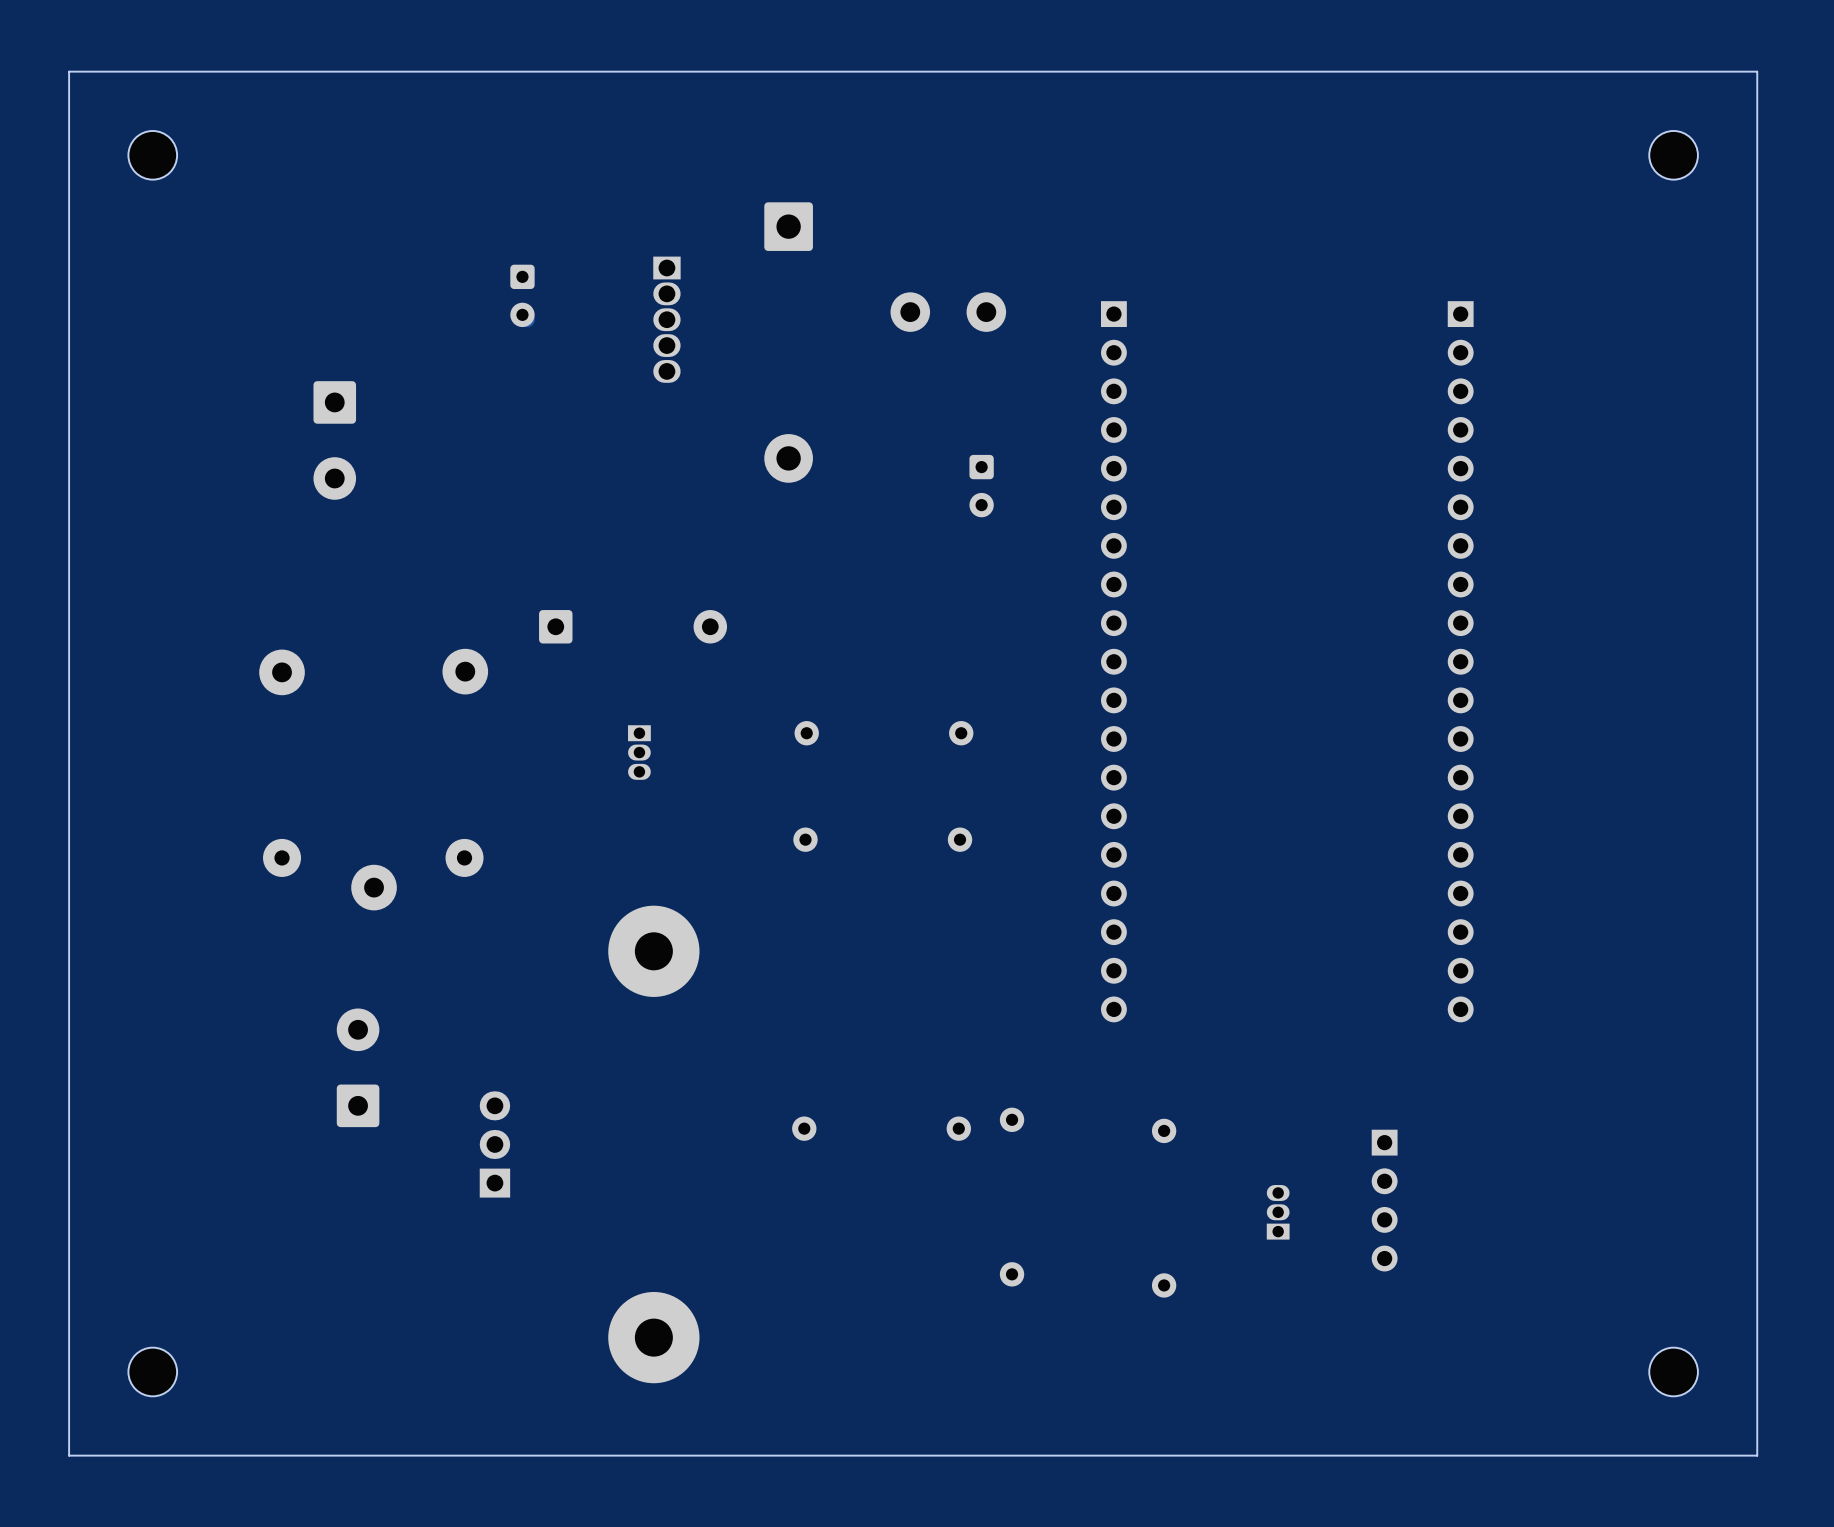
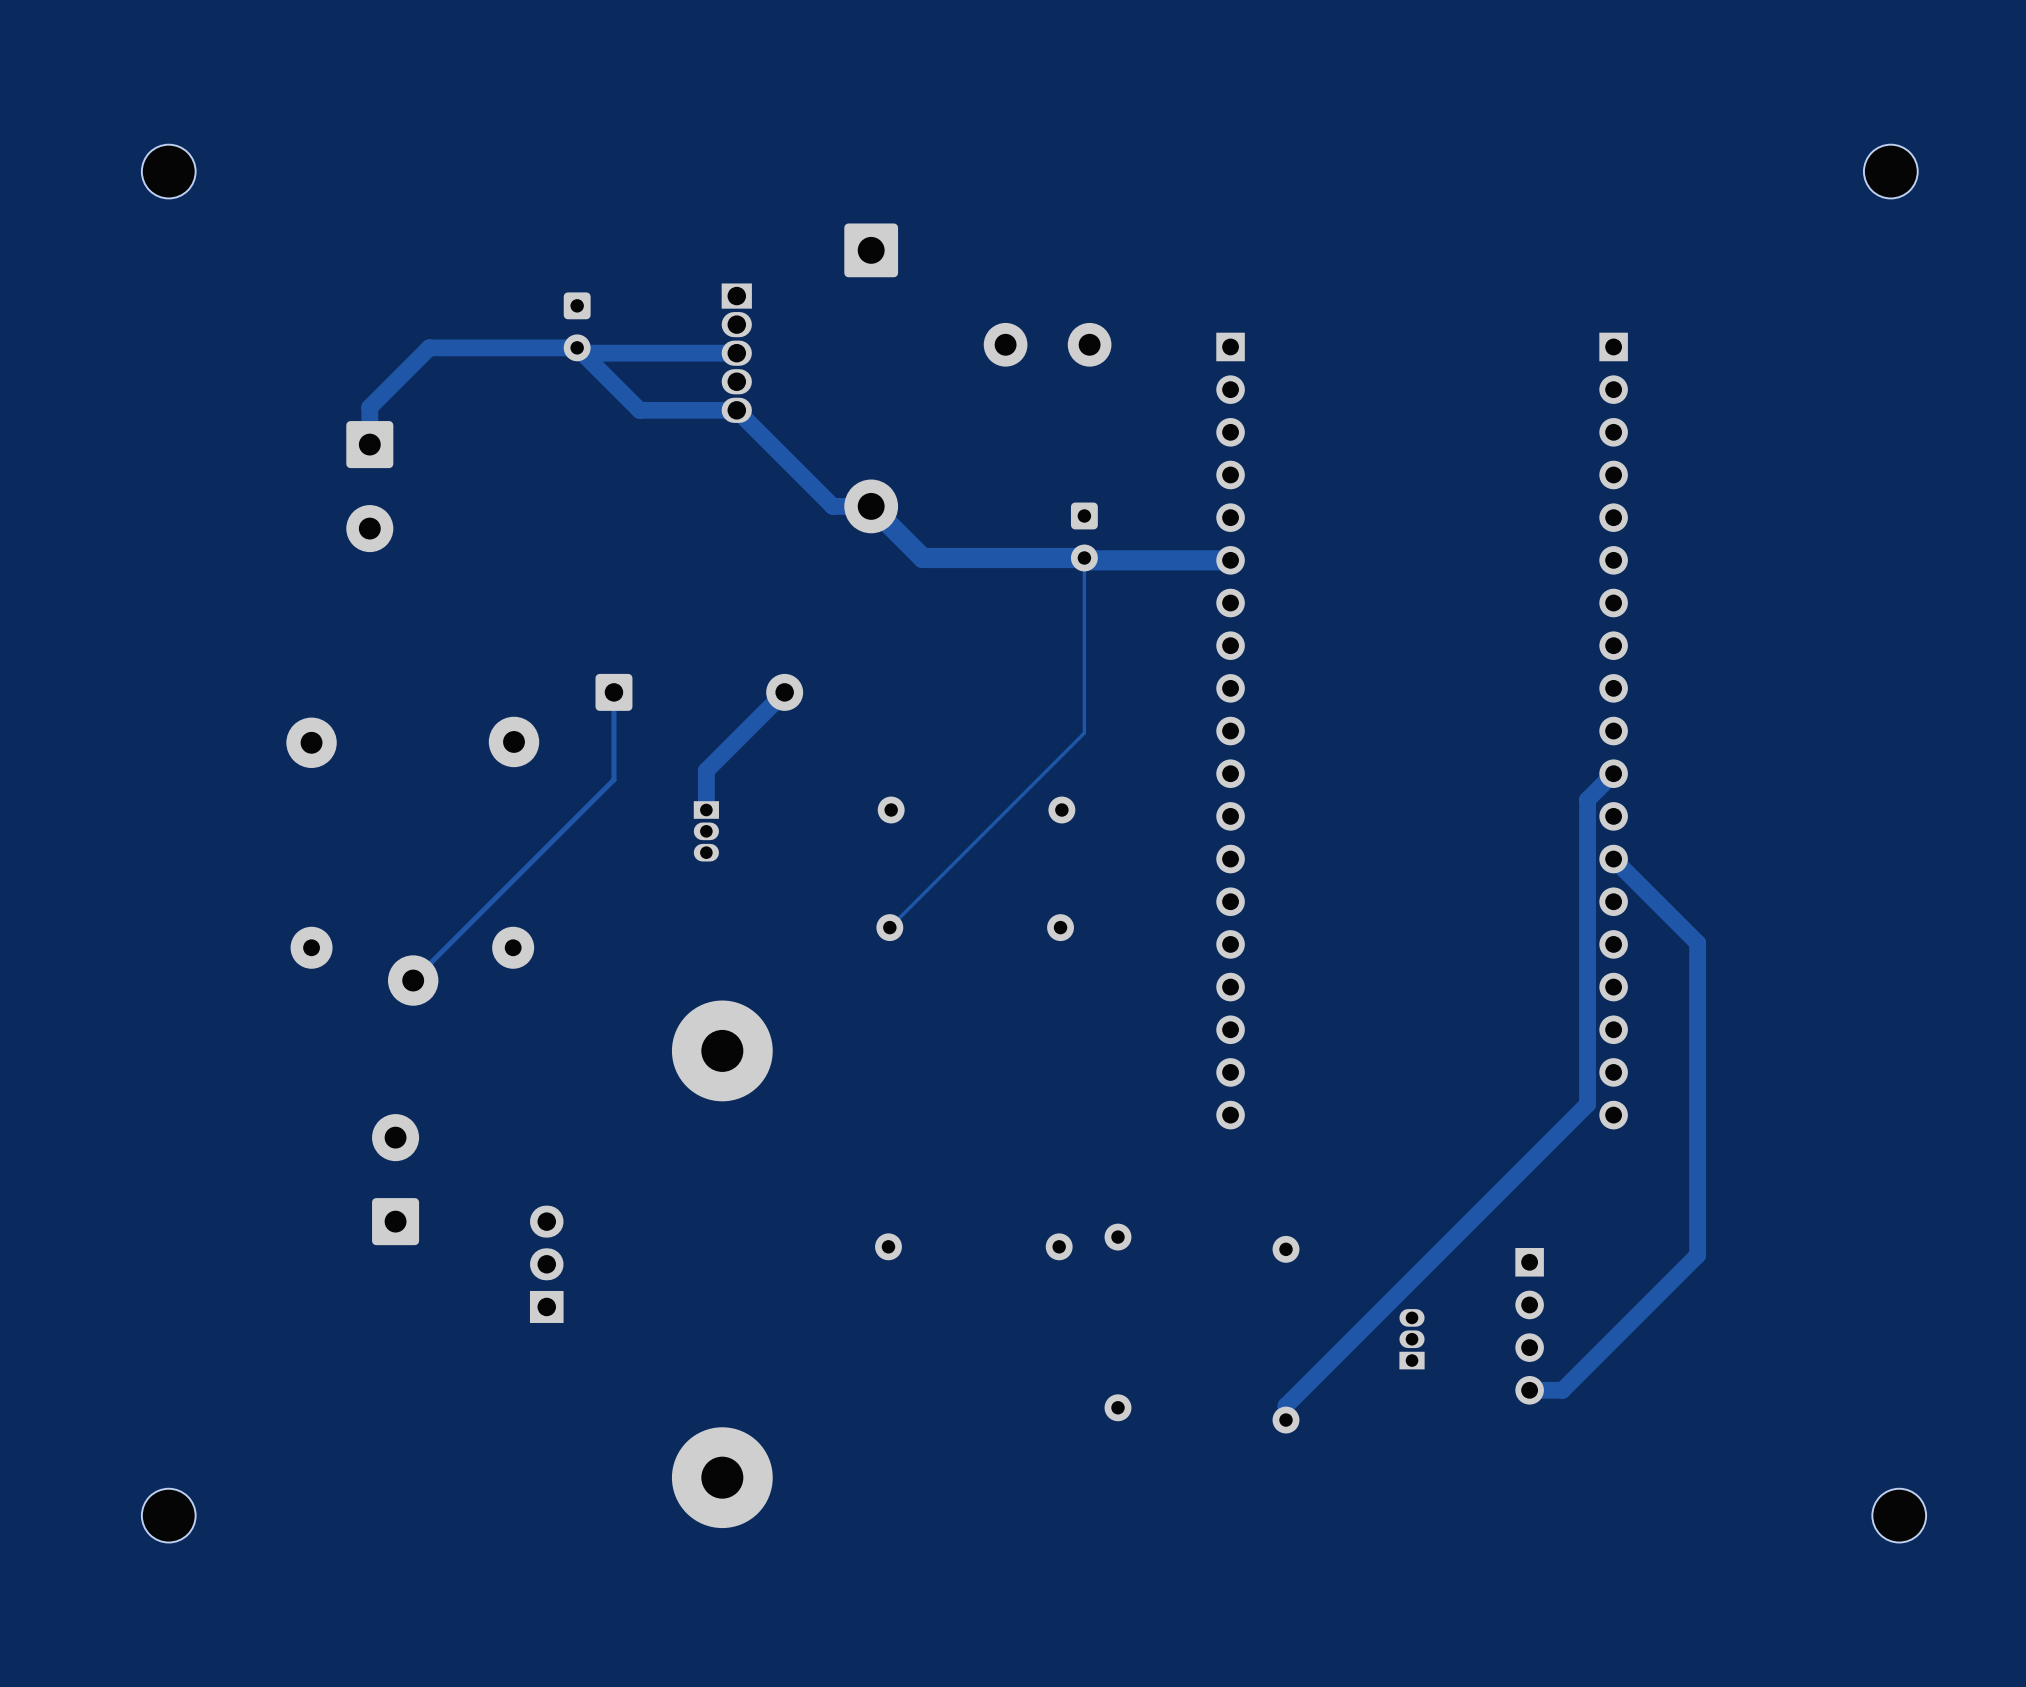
board edge: (1757, 71) (69, 71) (69, 1455) (1757, 1455) (1757, 71) -> none
part position: (1673, 155) -> (1890, 171)
track: none -> (577, 347) (429, 347) (369, 407) (369, 444)
track: none -> (736, 353) (582, 353) (639, 410) (736, 410) (832, 506) (871, 506) (922, 557) (1084, 557) (1084, 733) (889, 927)
track: none -> (1230, 560) (1086, 560)
track: none -> (613, 692) (613, 779) (413, 980)
track: none -> (784, 692) (706, 770) (706, 810)
track: none -> (1613, 773) (1587, 799) (1587, 1104) (1286, 1405) (1286, 1420)
track: none -> (1613, 859) (1697, 943) (1697, 1255) (1562, 1390) (1529, 1390)
part position: (1673, 1371) -> (1899, 1515)

